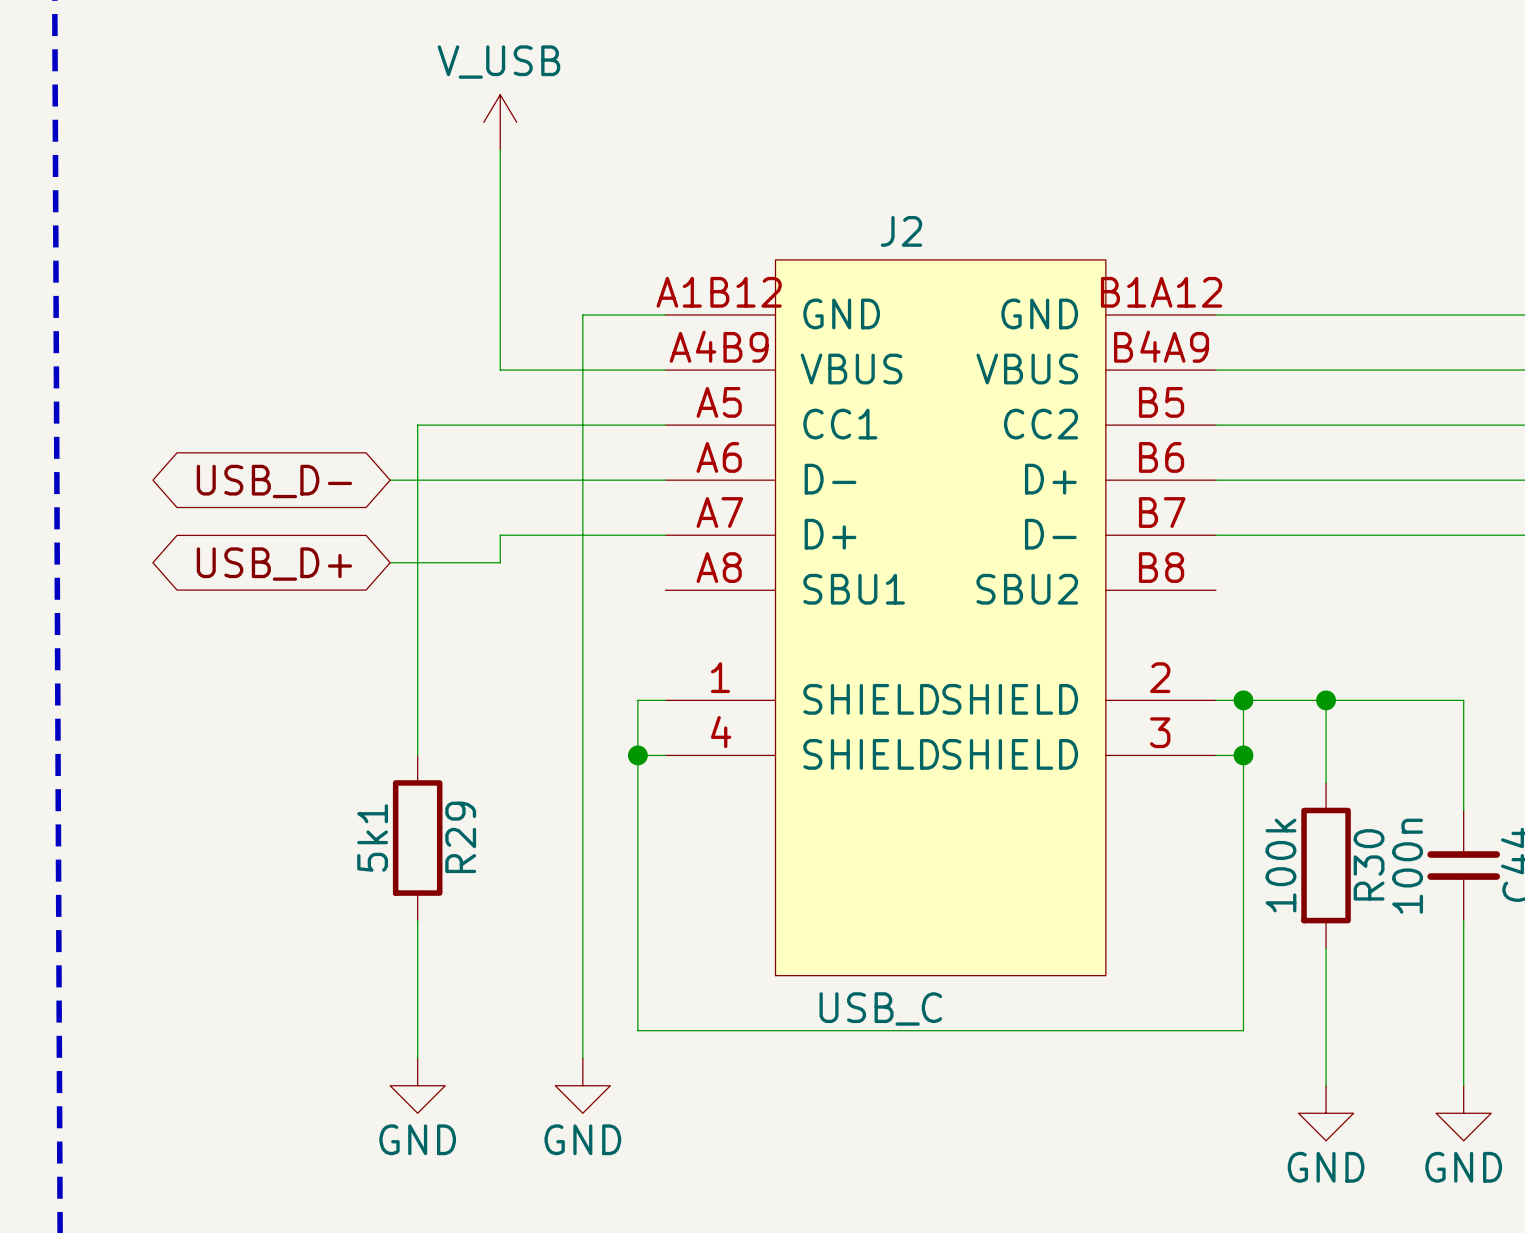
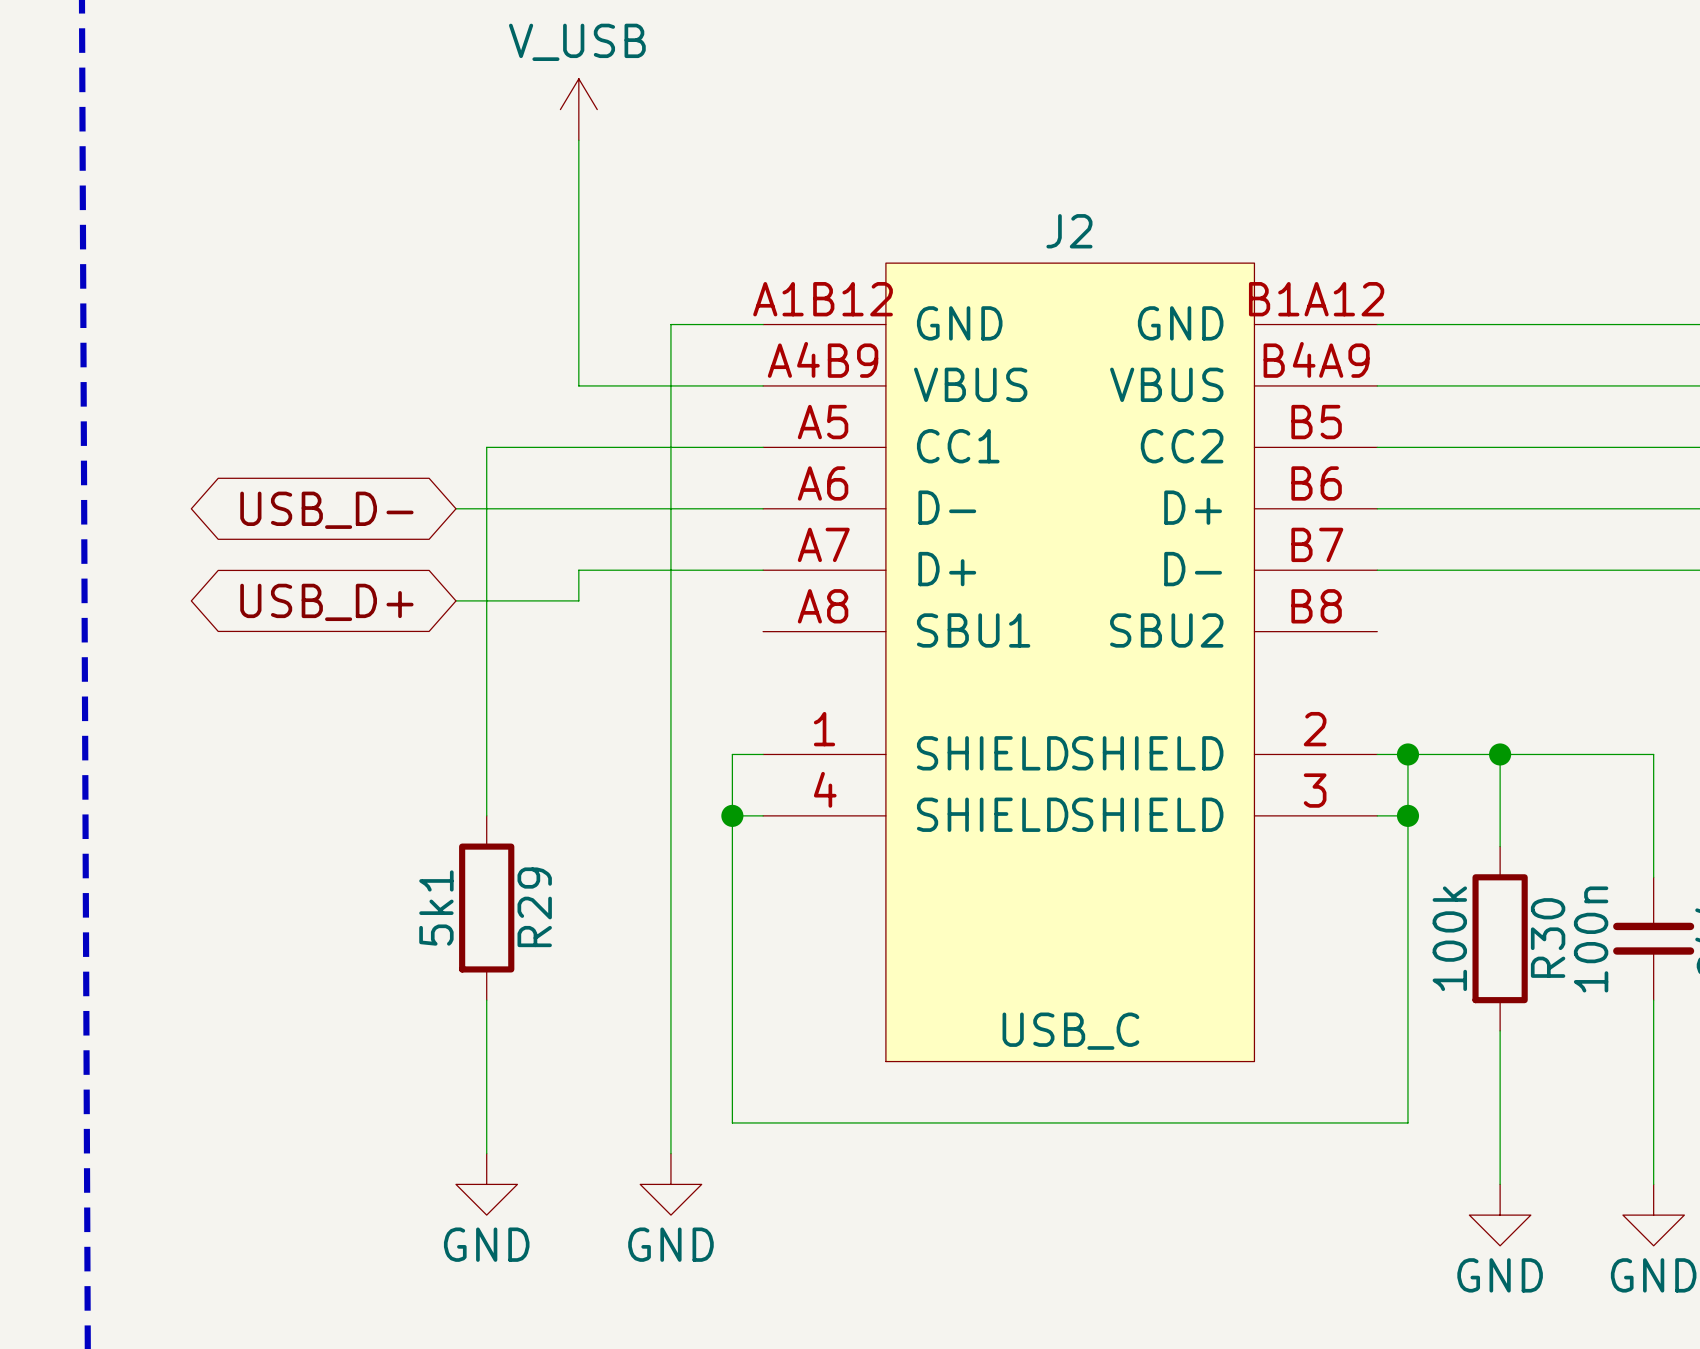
J2 name position: J2 (901, 231) -> J2 (1069, 231)
J2 value position: USB_C (880, 1008) -> USB_C (1070, 1031)

